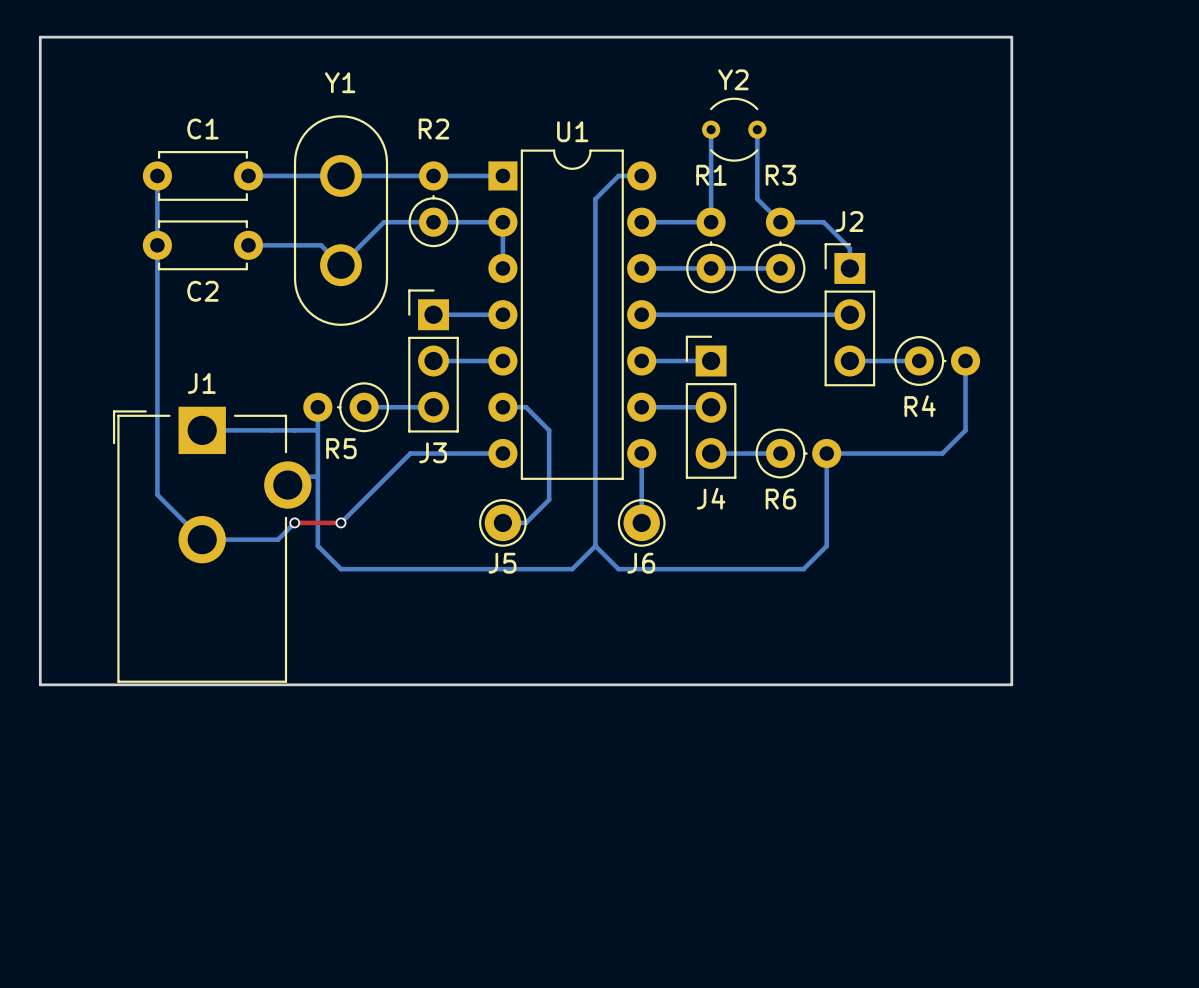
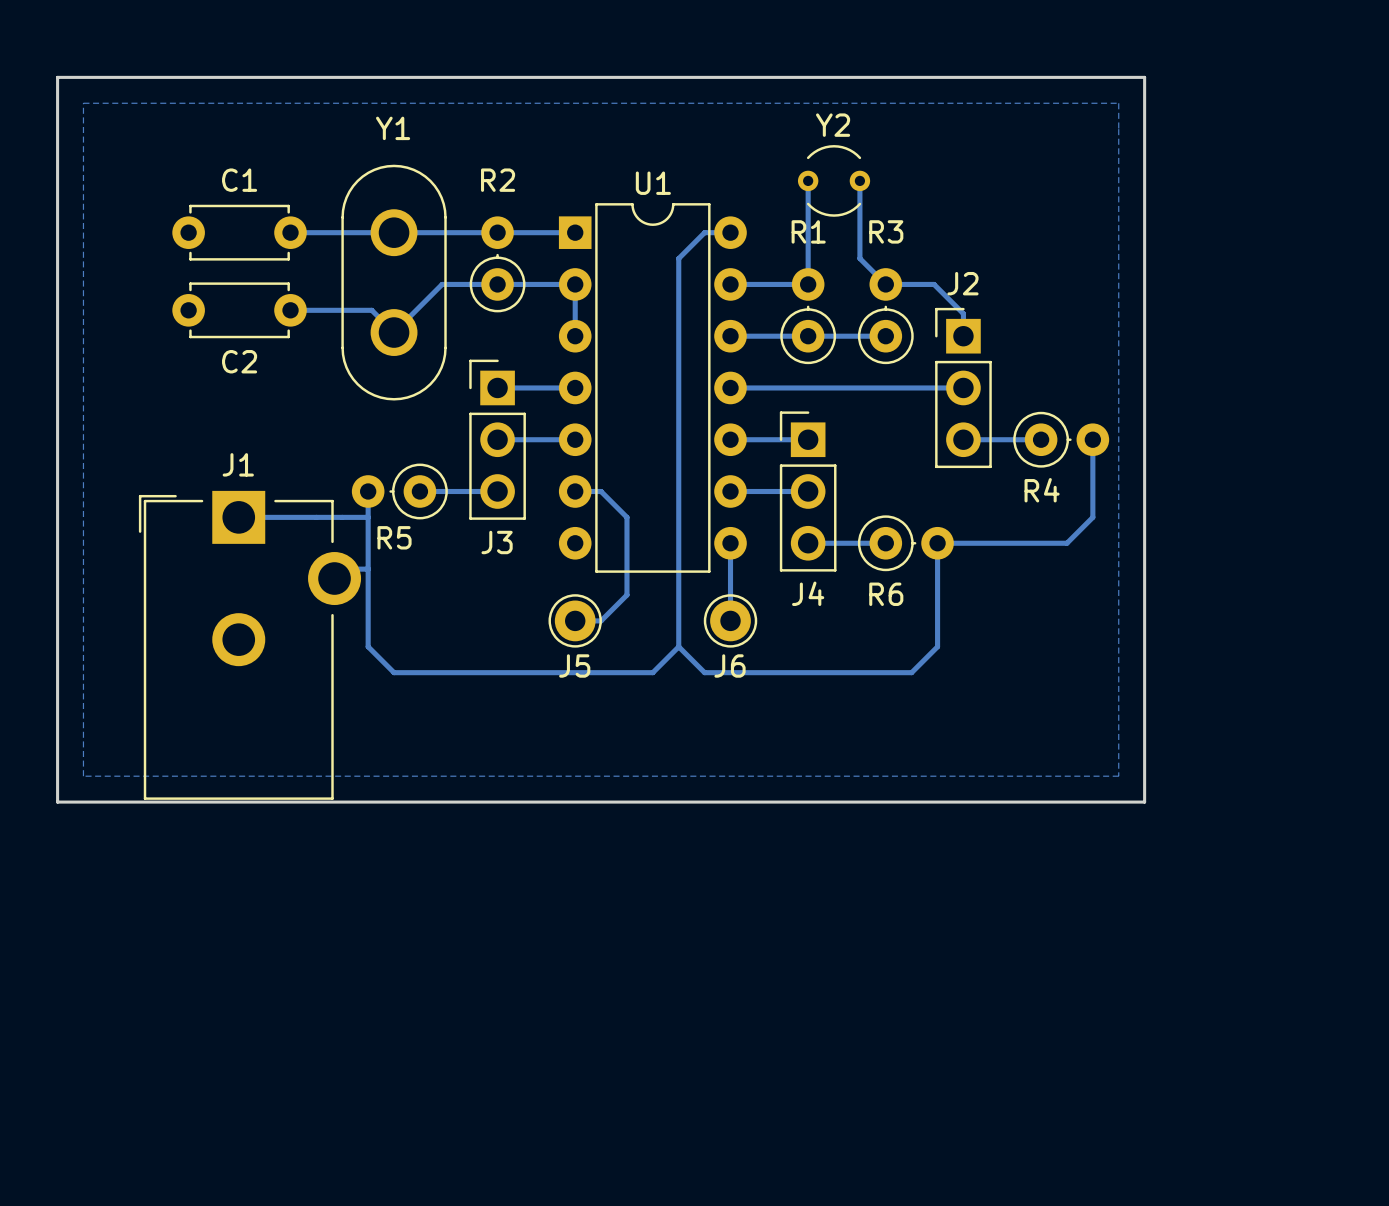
bottom zone outline: none -> (83, 103) (83, 776) (1118, 776) (1118, 103) (83, 103)
bottom track: (157, 175) (157, 494) (202, 539) (277, 539) (294, 522) -> none
bottom track: (502, 453) (410, 453) (341, 522) -> none
top track: (294, 522) (341, 522) -> none
via: (294, 522) -> none
via: (341, 522) -> none

